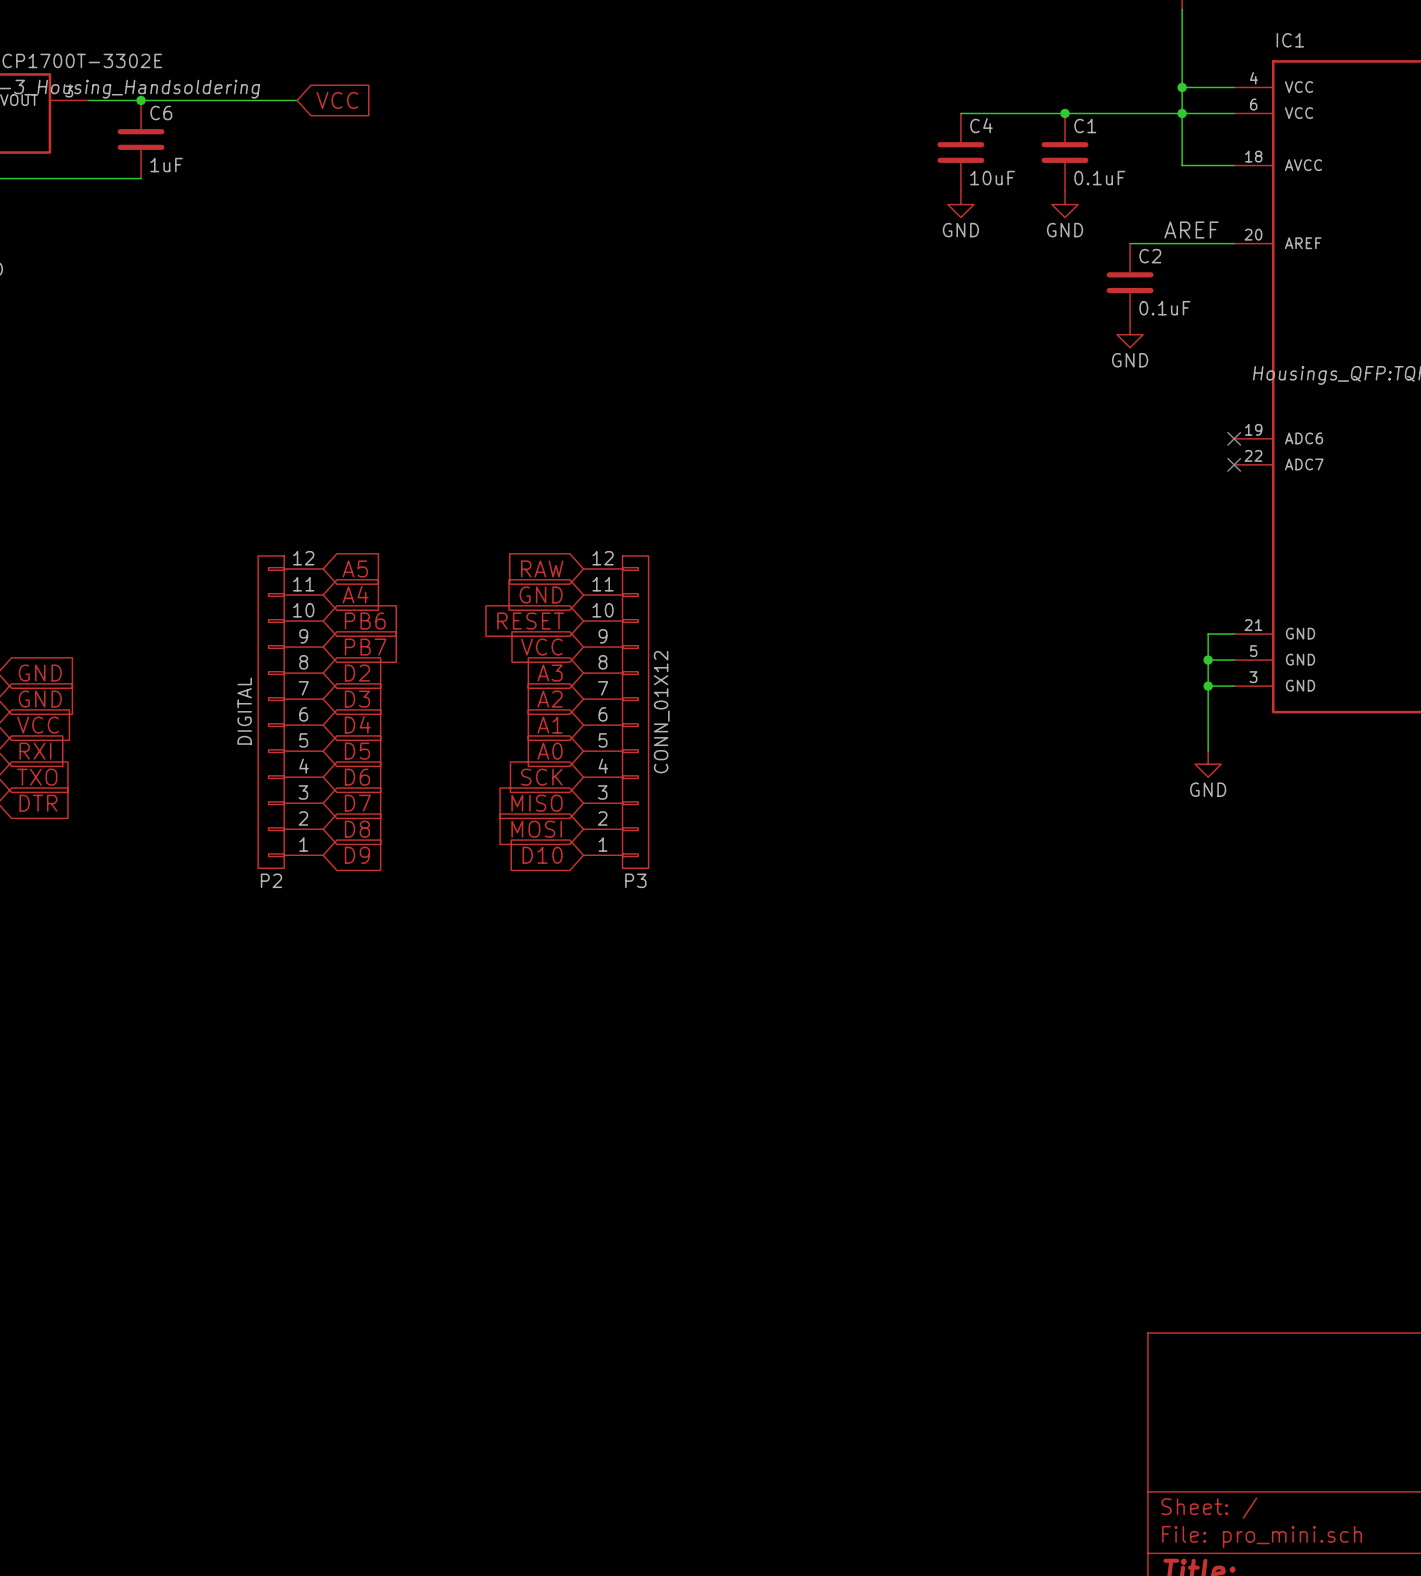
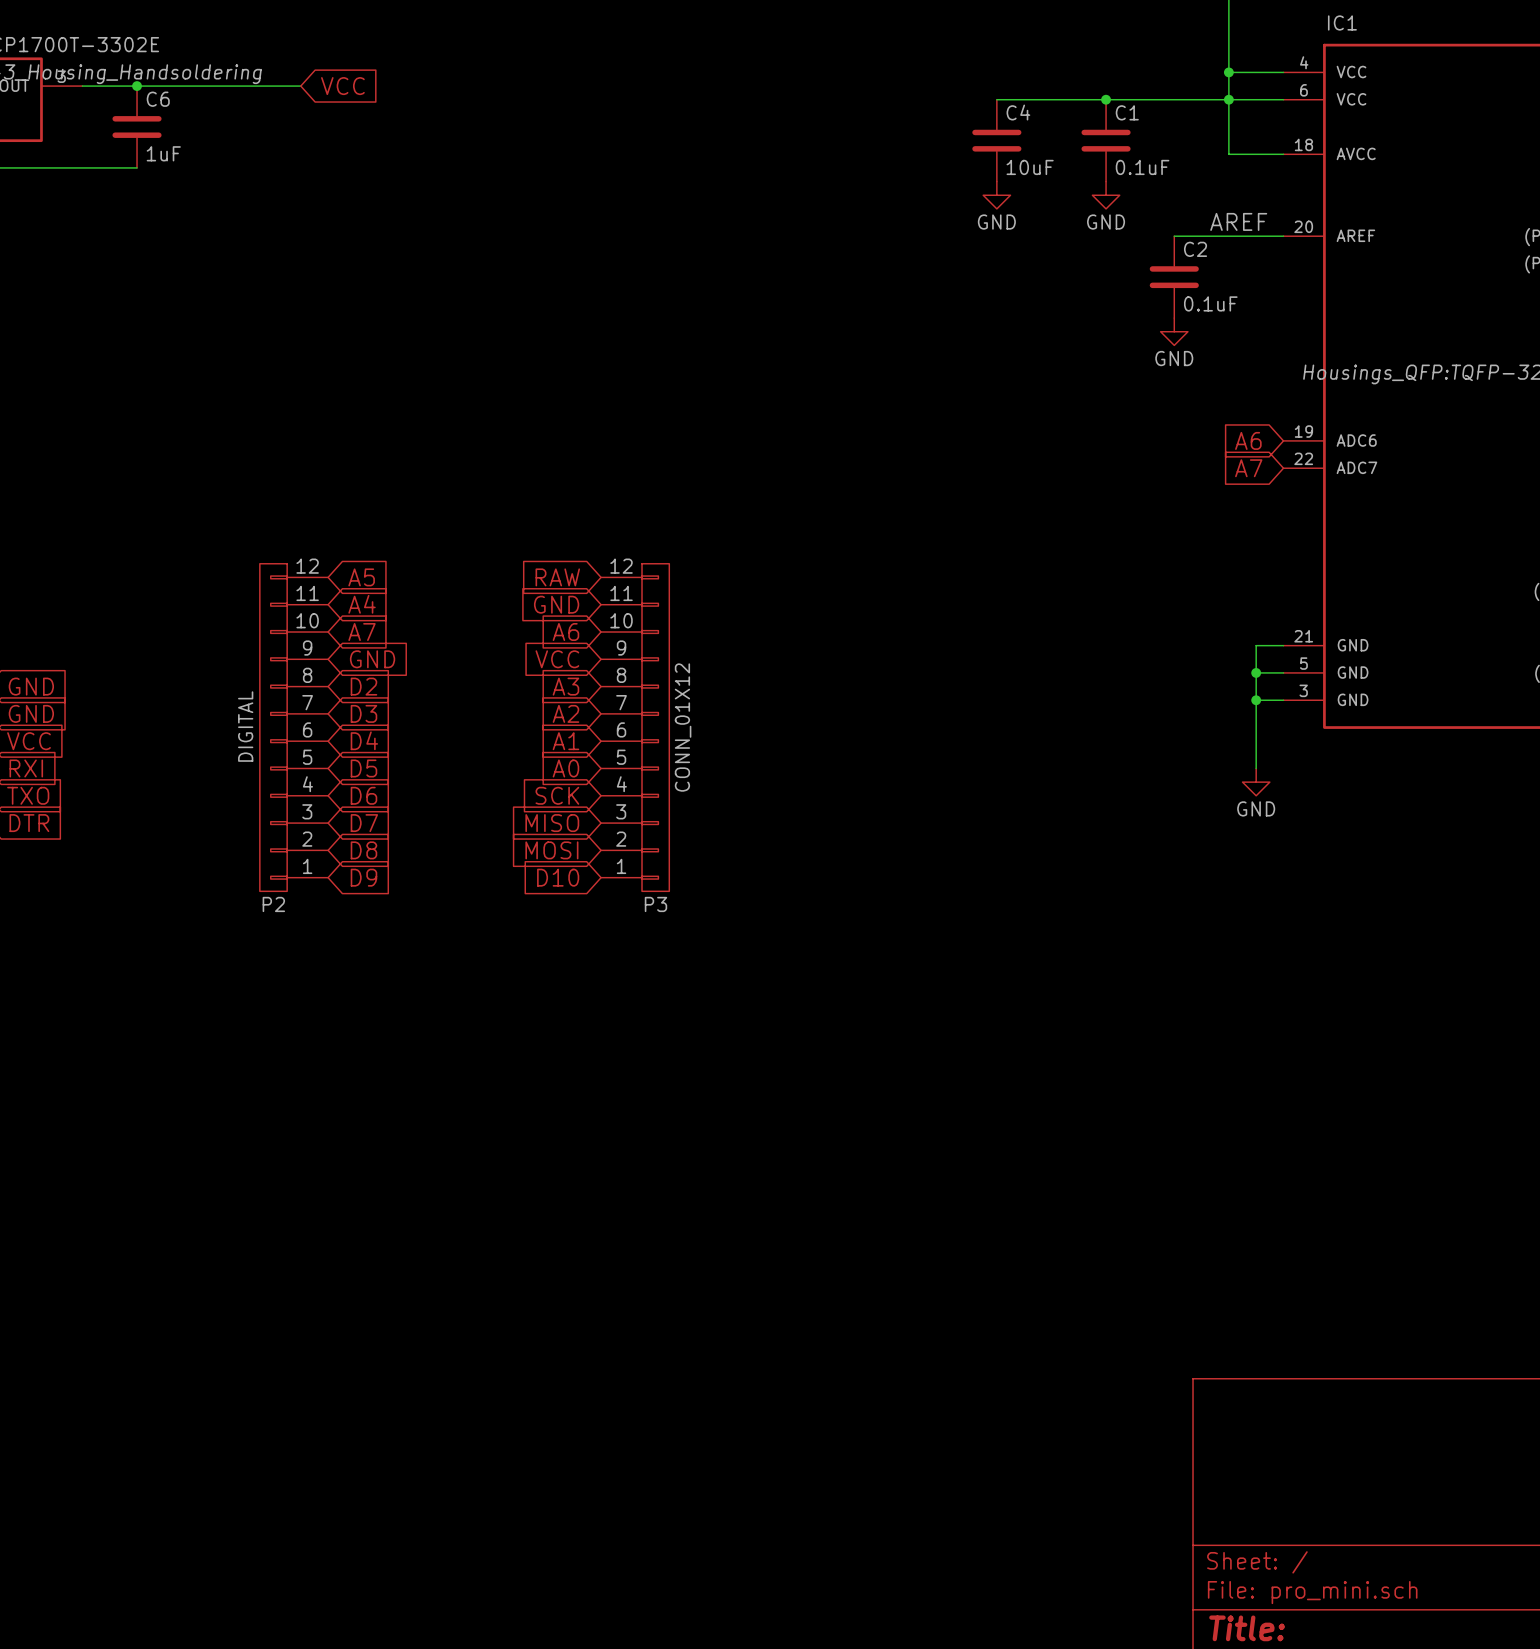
global label: none -> A6 (1248, 440)
no-connect mark: (1234, 438) -> none
global label: none -> A7 (1248, 468)
no-connect mark: (1234, 464) -> none
global label: PB6 (365, 621) -> A7 (362, 632)
global label: RESET (530, 621) -> A6 (565, 632)
global label: PB7 (365, 647) -> GND (372, 659)

